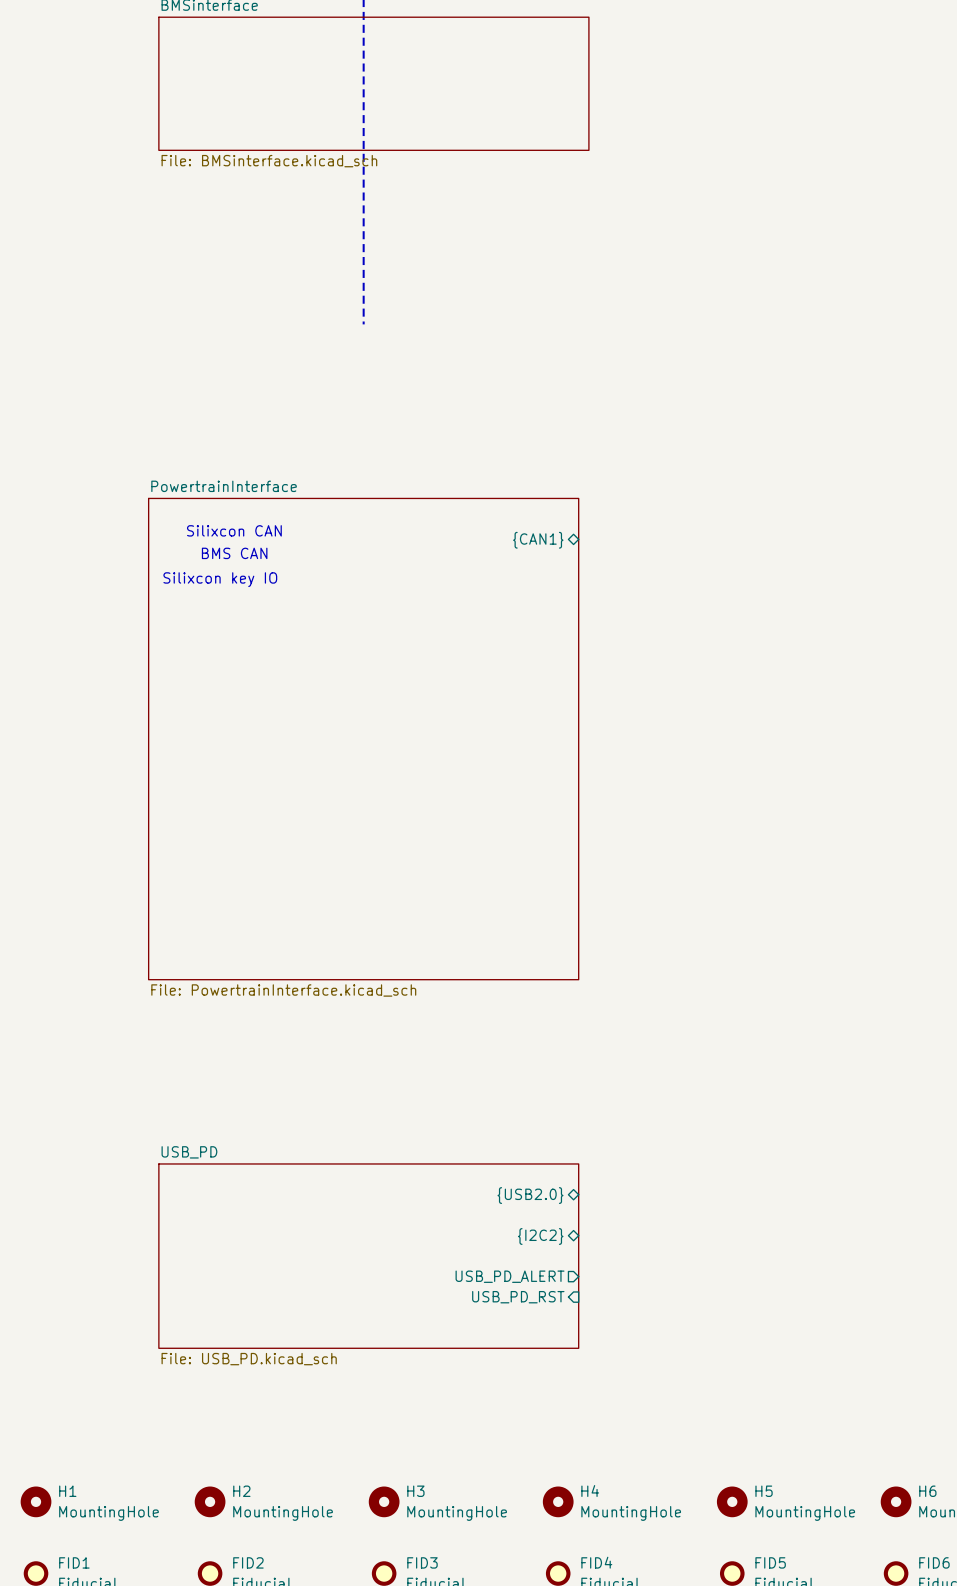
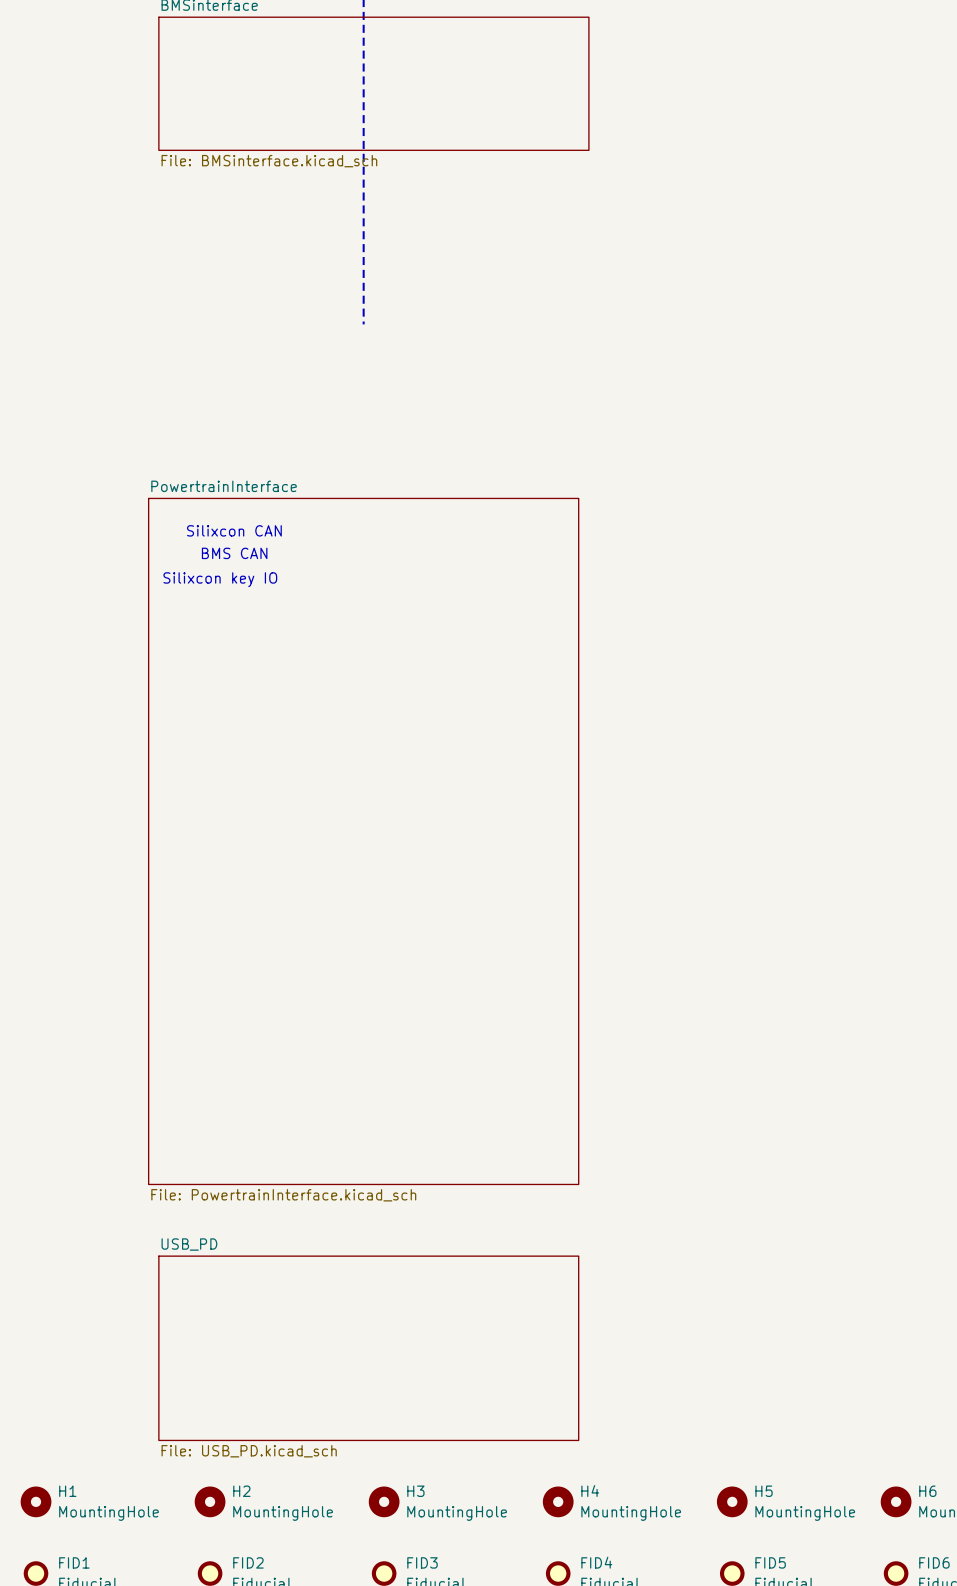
sheet pin: {CAN1} (538, 540) -> none
sheet PowertrainInterface: File: PowertrainInterface.kicad_sch (363, 739) -> none
sheet PowertrainInterface: none -> File: PowertrainInterface.kicad_sch (363, 841)
sheet pin: {USB2.0} (530, 1195) -> none
sheet pin: {I2C2} (540, 1236) -> none
sheet USB_PD position: (368, 1256) -> (368, 1348)
sheet pin: USB_PD_ALERT (510, 1276) -> none
sheet pin: USB_PD_RST (518, 1297) -> none

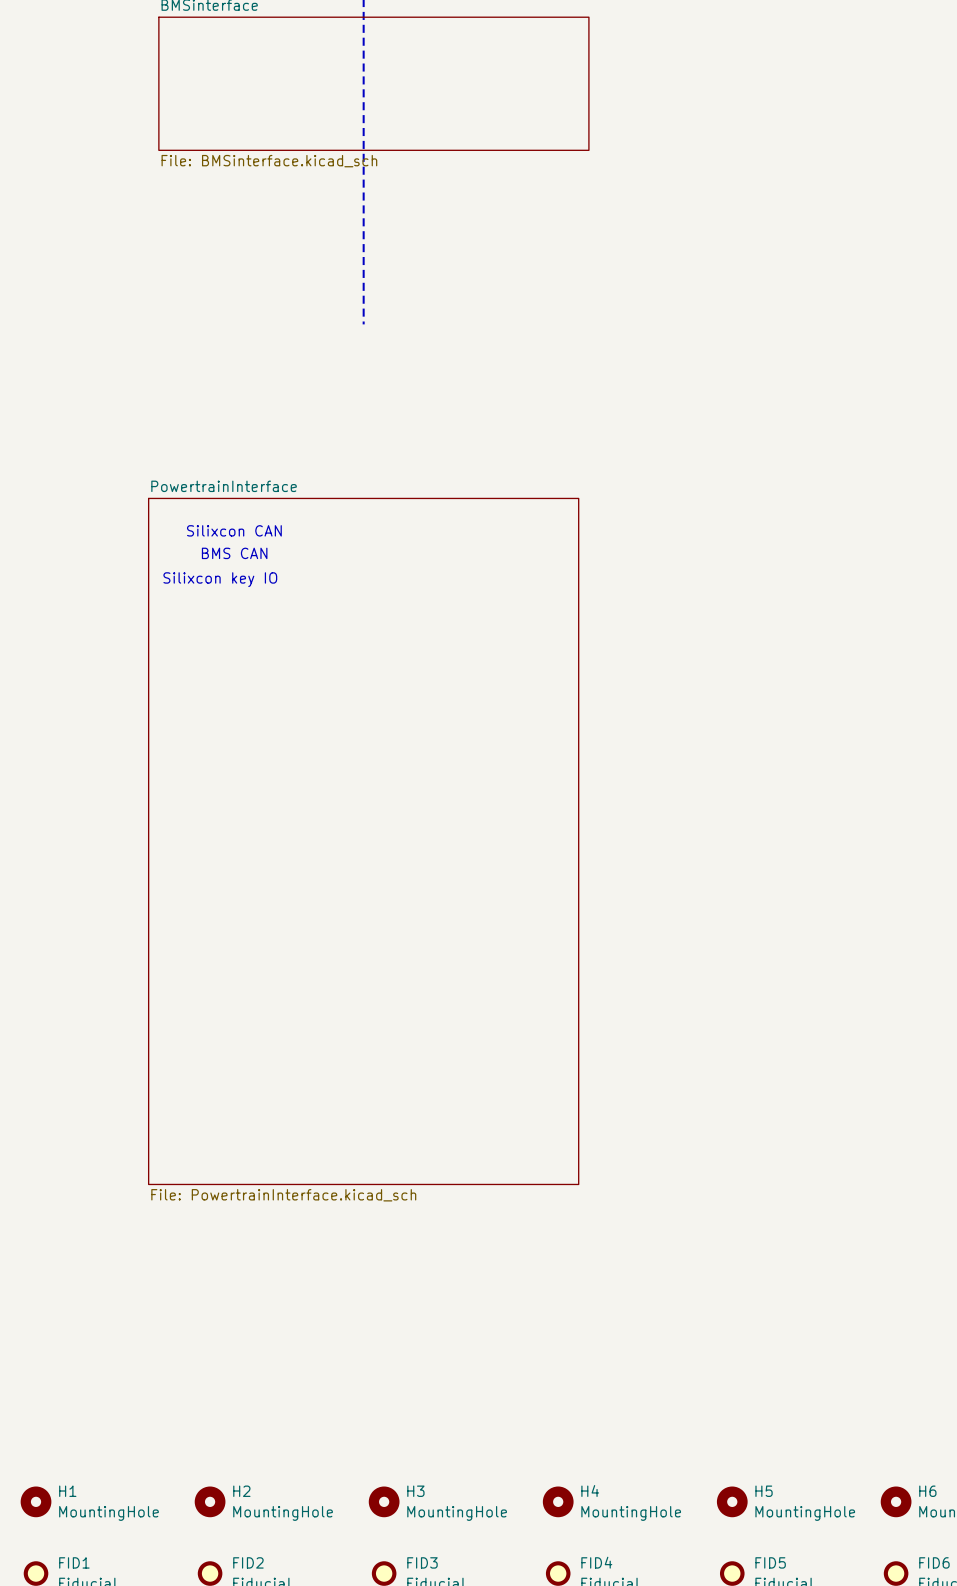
sheet USB_PD: File: USB_PD.kicad_sch (368, 1348) -> none

